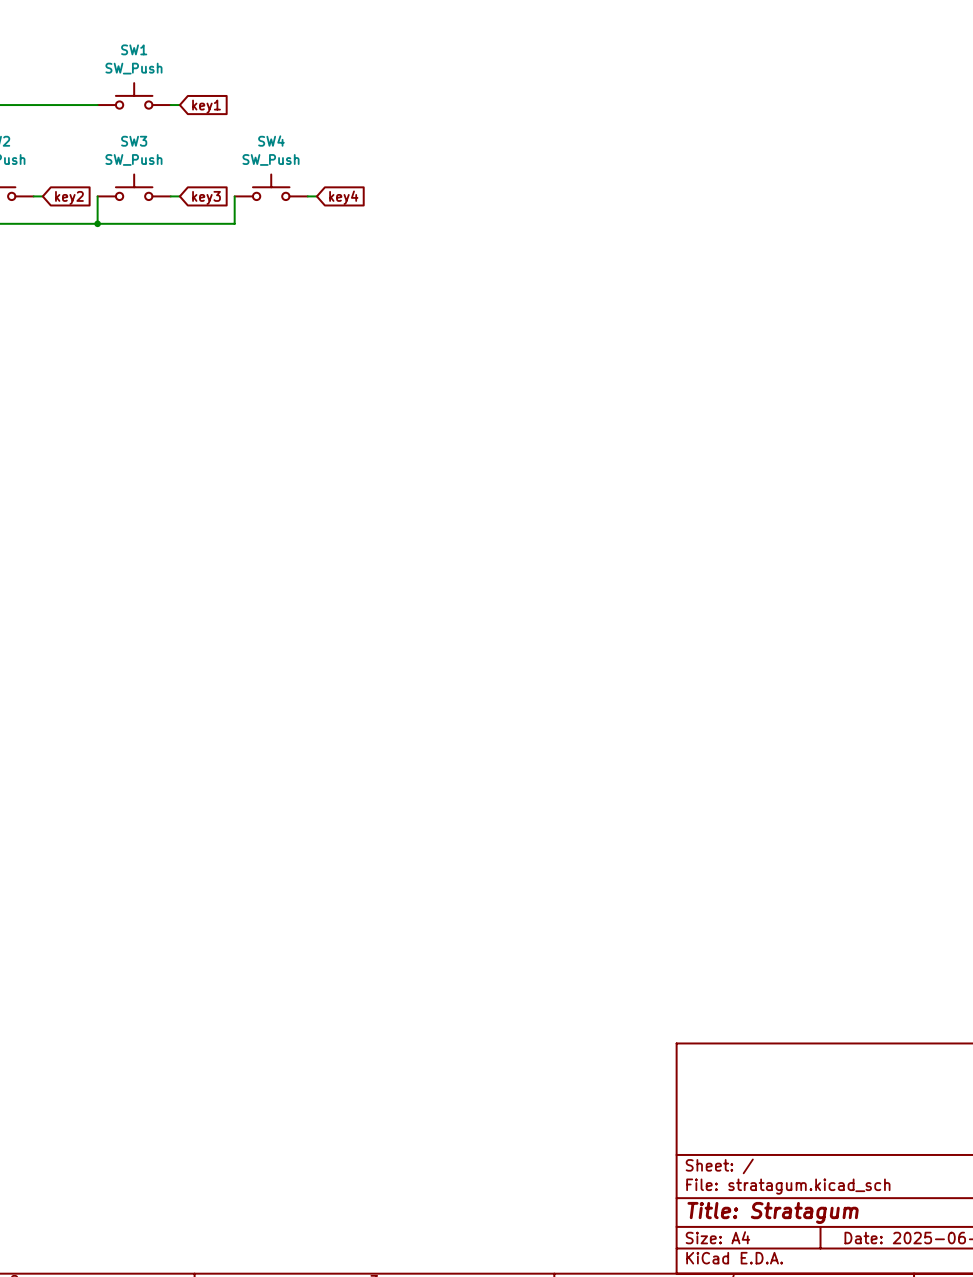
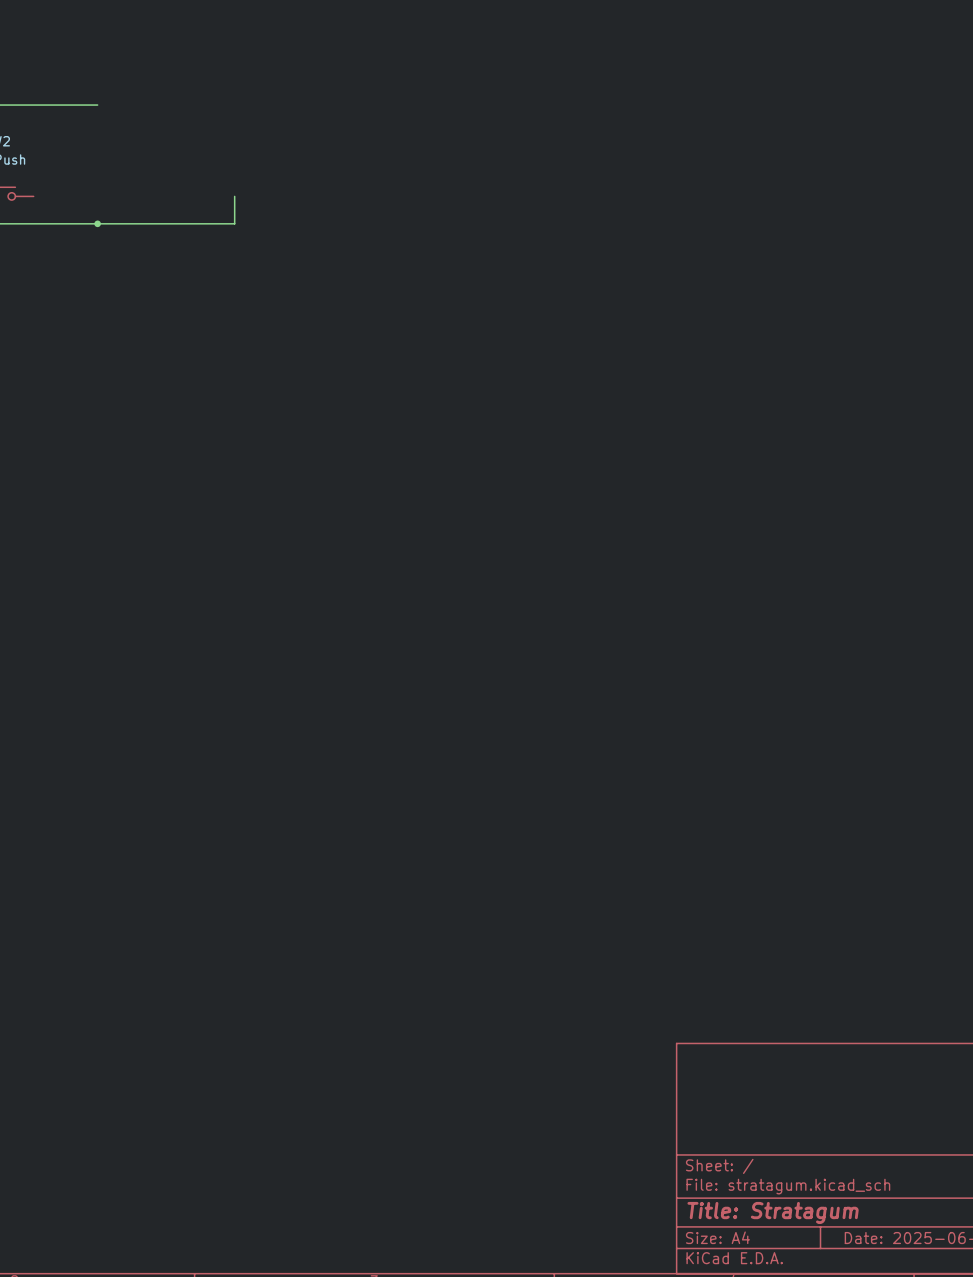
SW1: SW_Push (134, 95) -> none
wire: (170, 105) (179, 105) -> none
global label: key1 (206, 106) -> none
SW3: SW_Push (134, 187) -> none
SW4: SW_Push (271, 187) -> none
wire: (33, 196) (42, 196) -> none
wire: (97, 196) (97, 223) -> none
wire: (170, 196) (179, 196) -> none
wire: (307, 196) (316, 196) -> none
global label: key2 (69, 197) -> none
global label: key3 (206, 197) -> none
global label: key4 (343, 197) -> none

